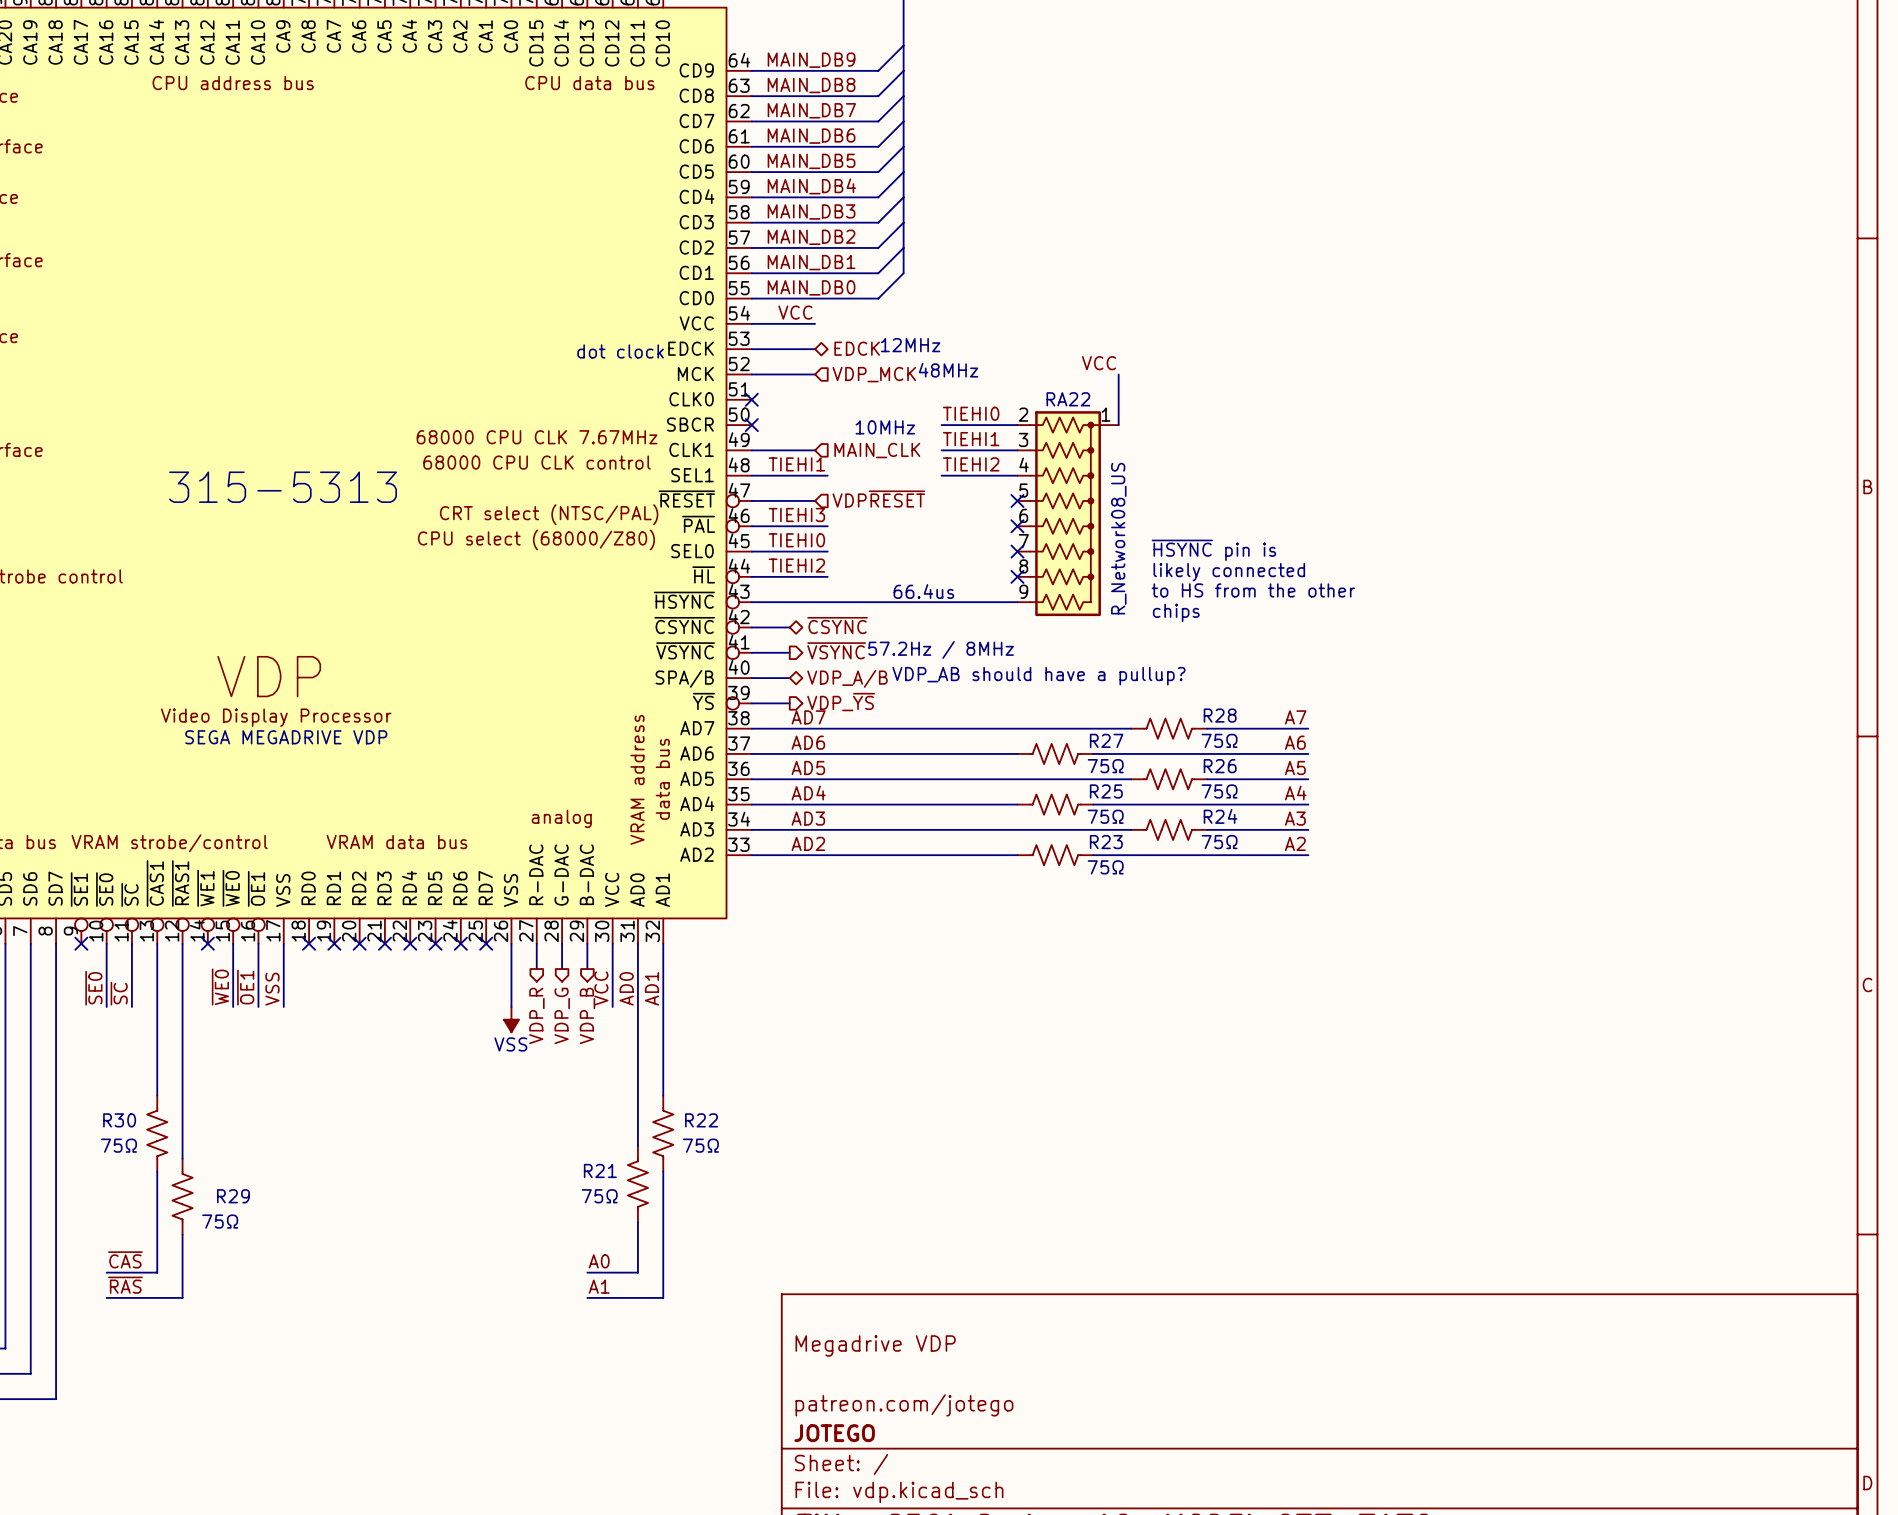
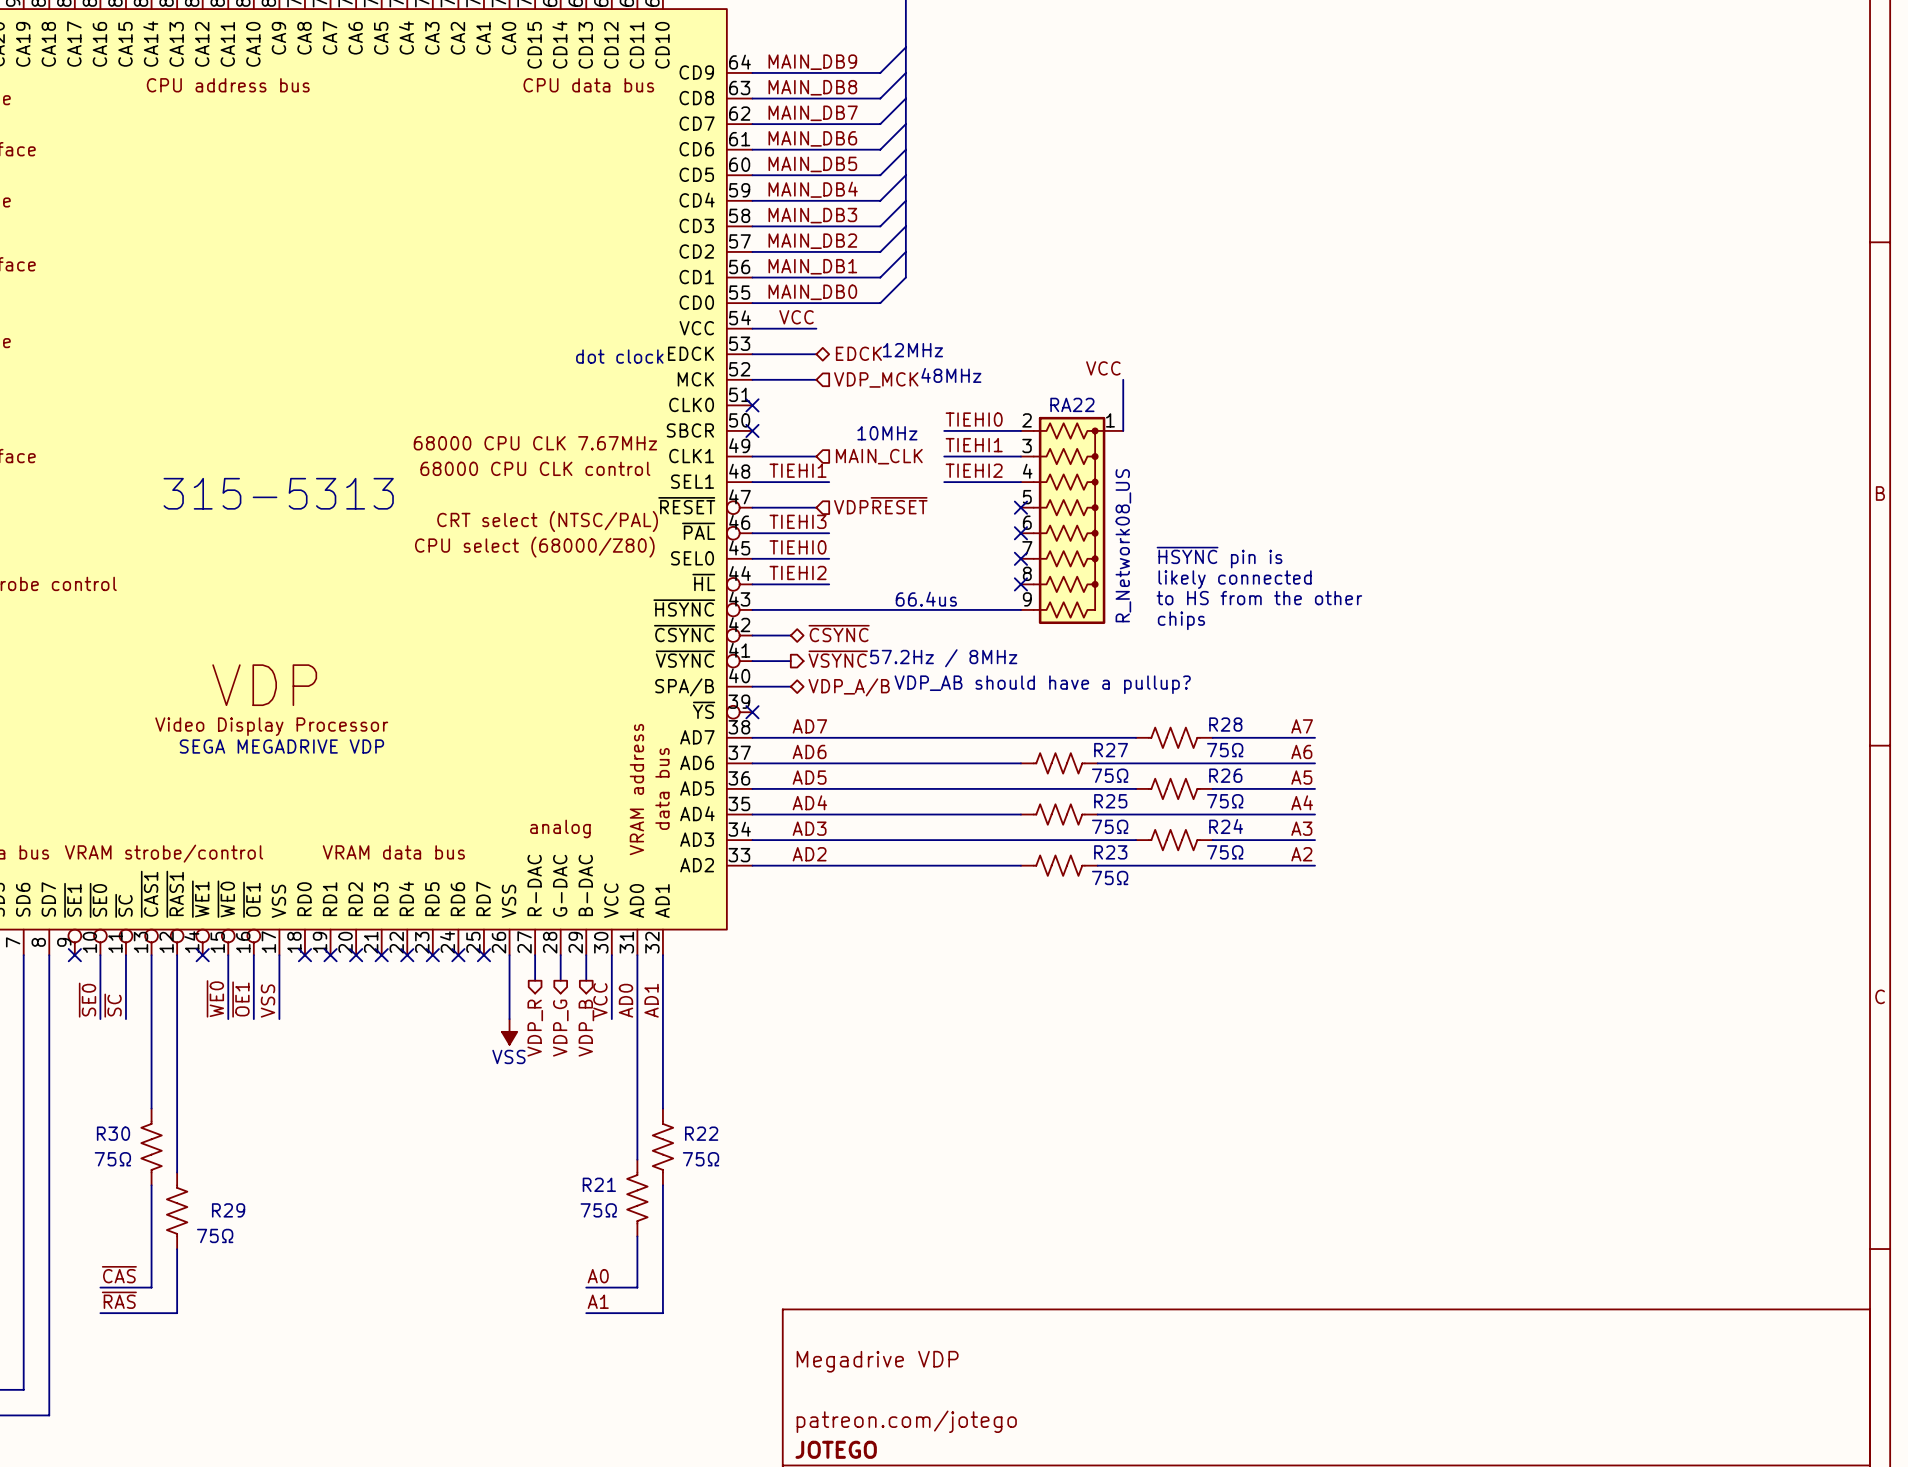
hierarchical label: VDP_~{YS} (841, 702) -> none
wire: (751, 703) (789, 703) -> none
no-connect mark: none -> (752, 712)

